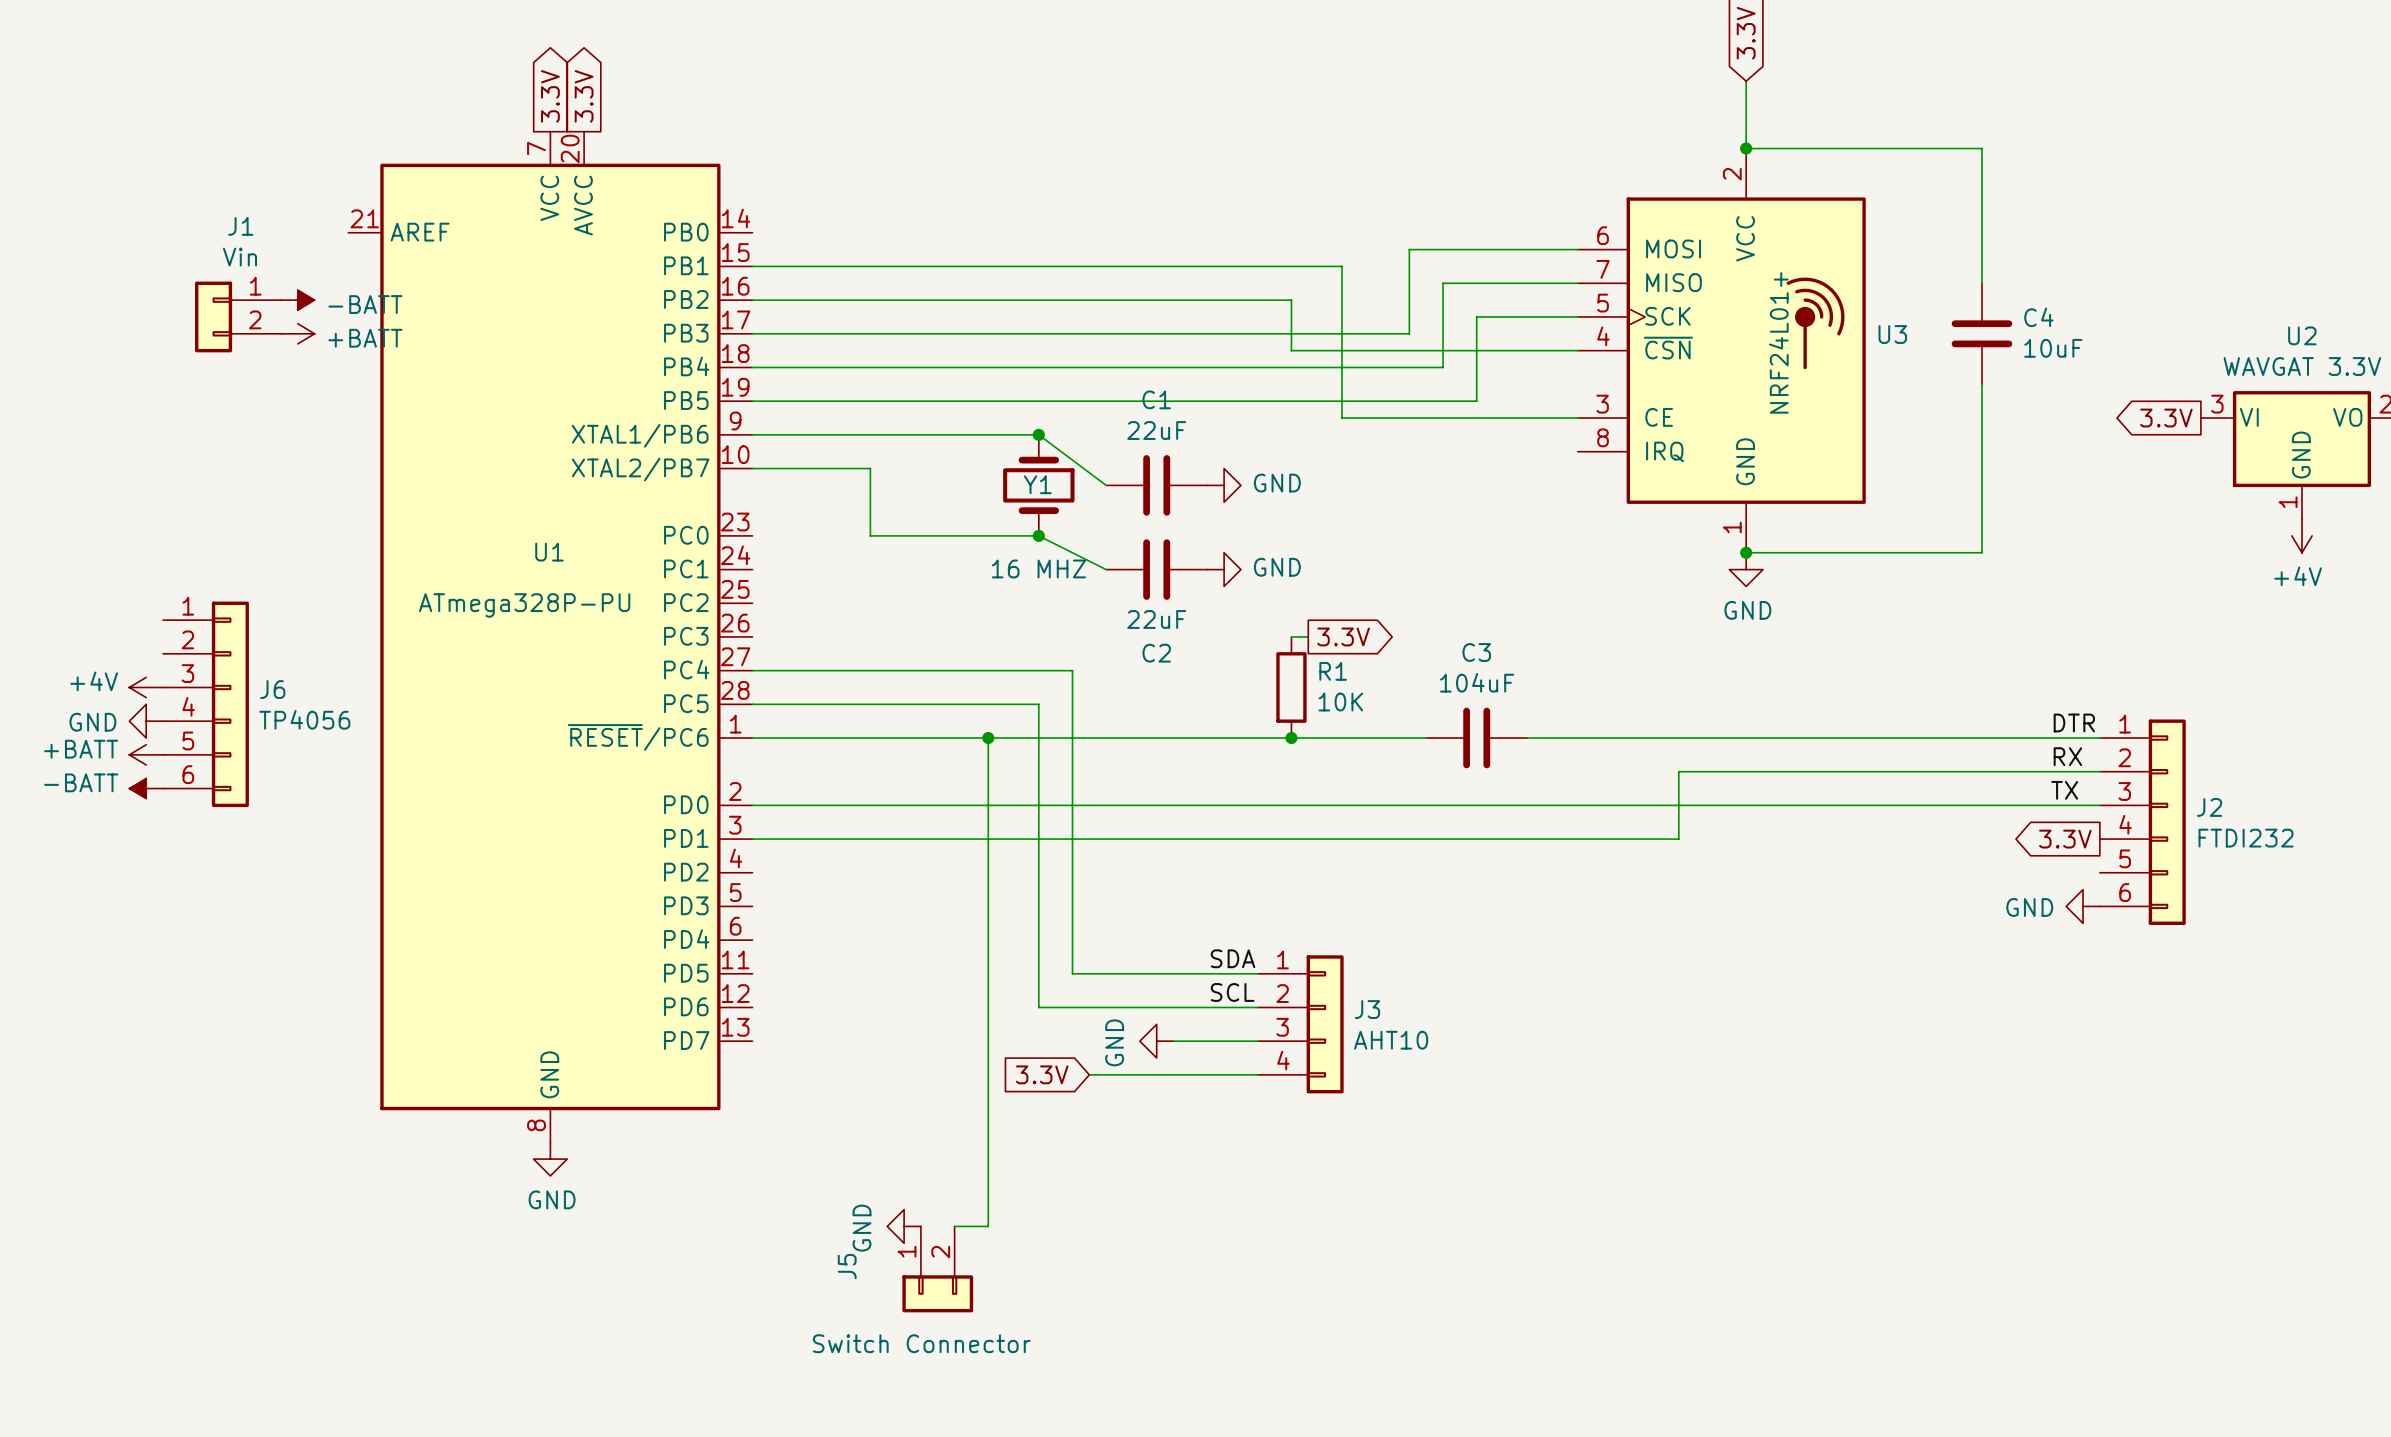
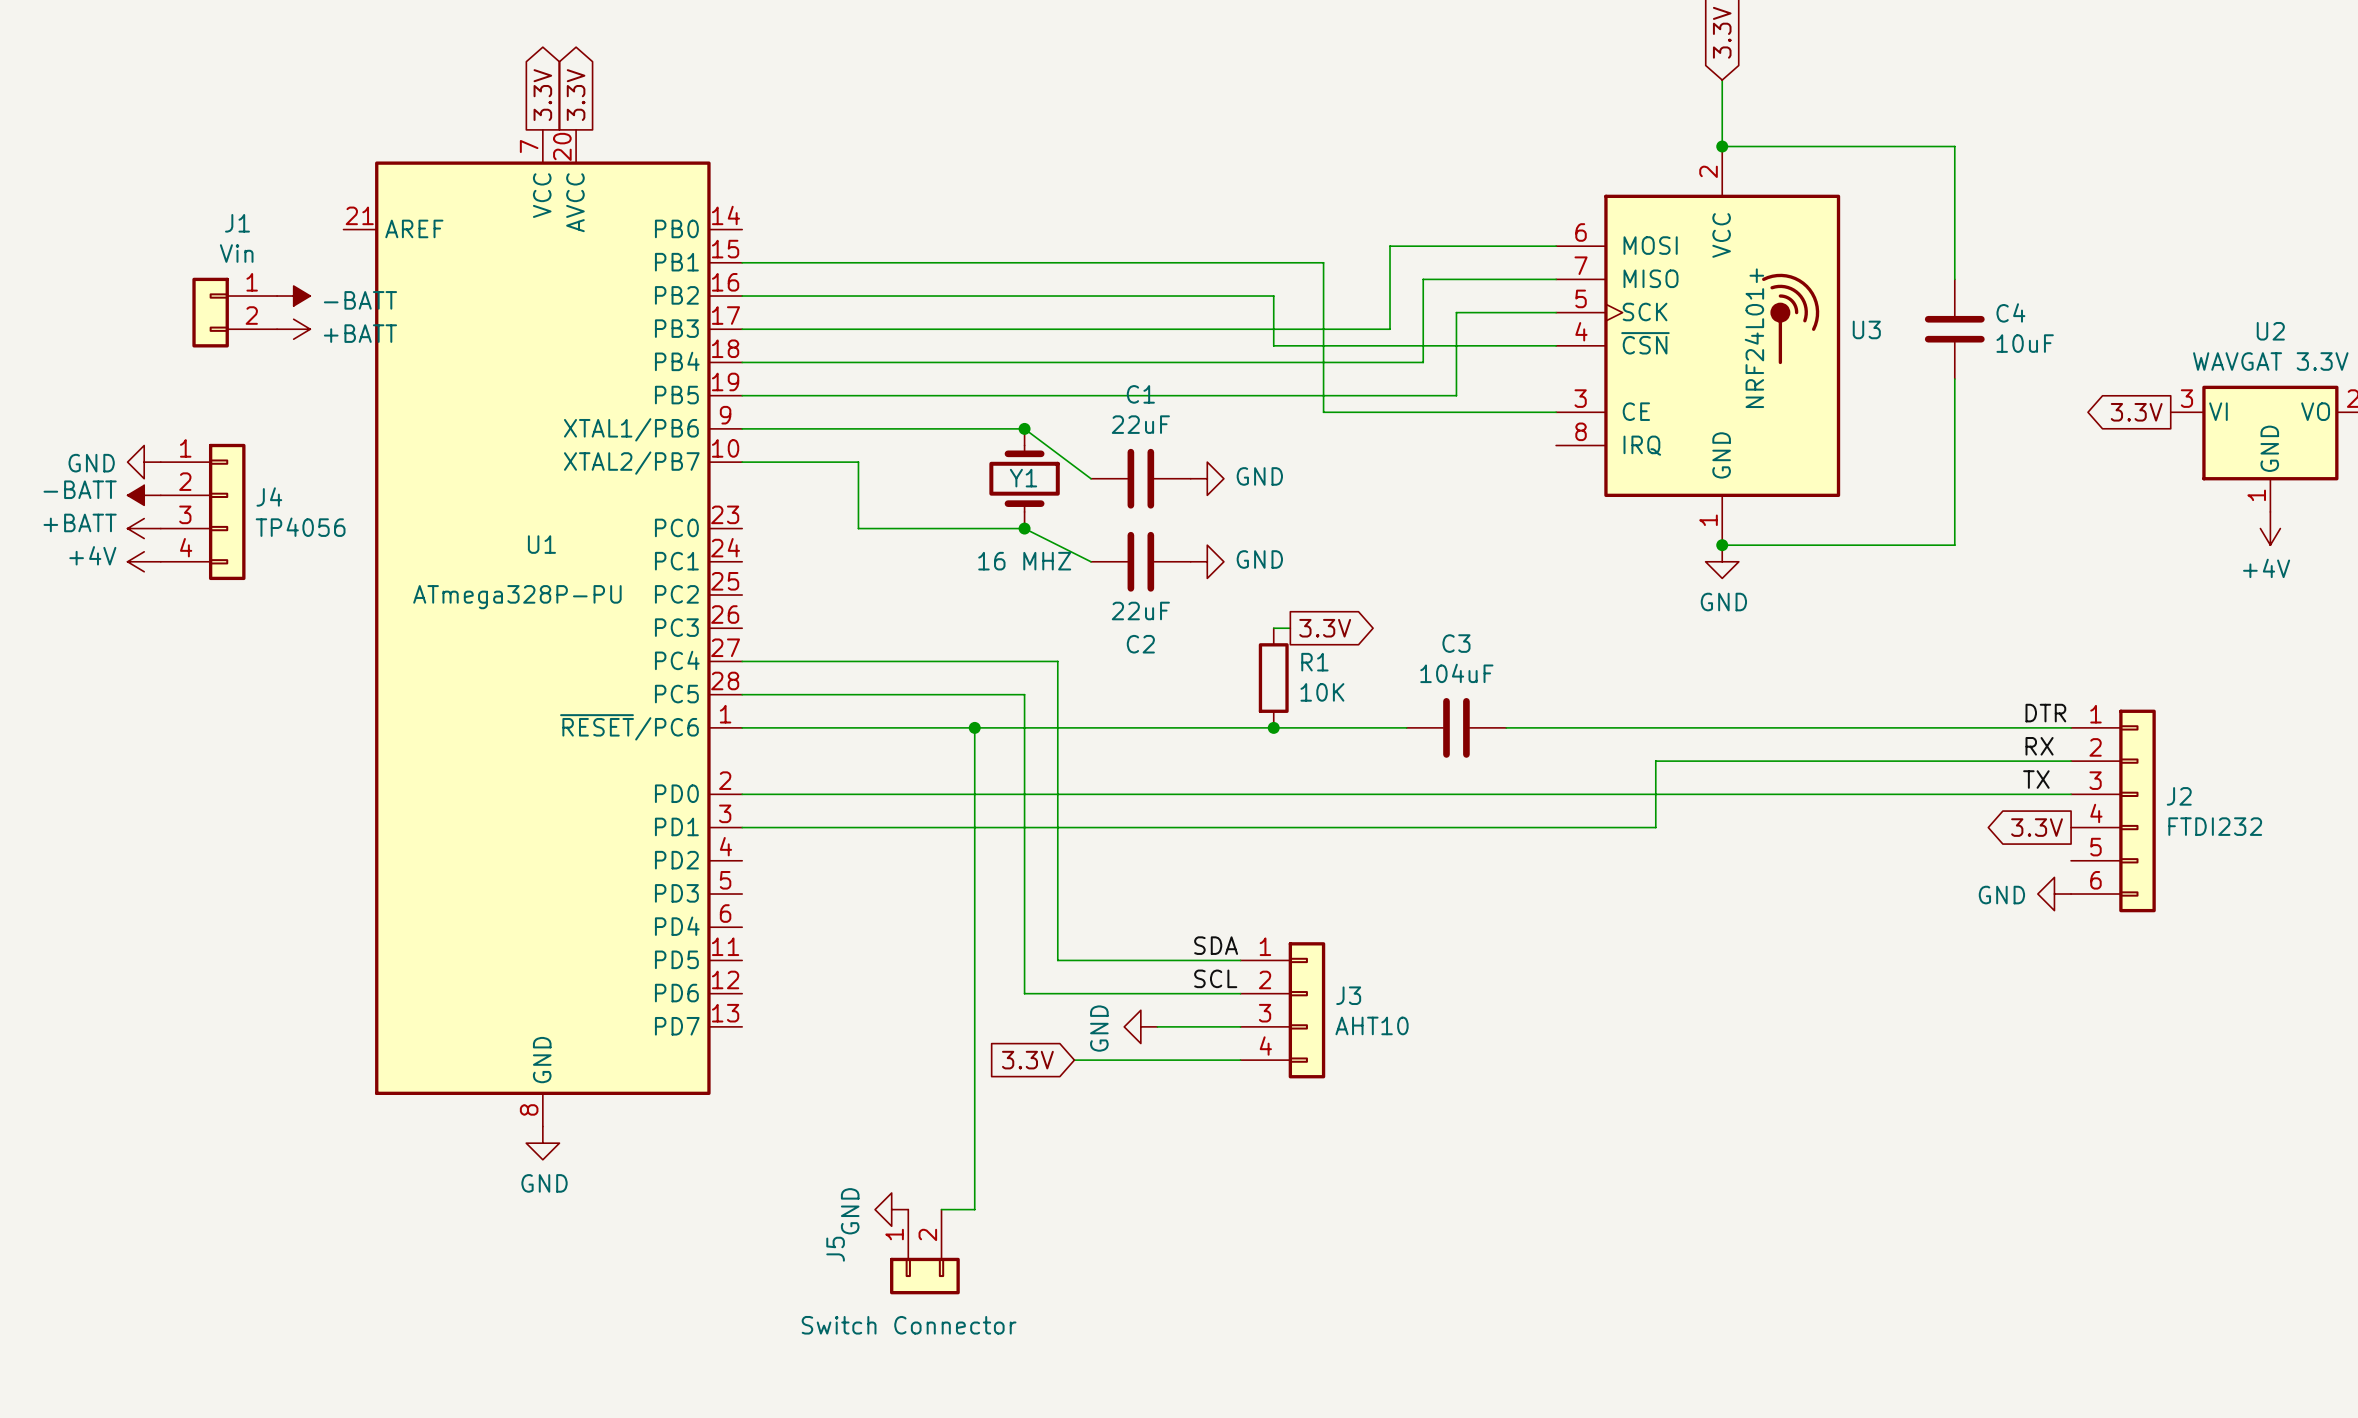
J4: none -> TP4056 (203, 511)
power symbol position: +4V (146, 687) -> +4V (144, 561)
J6: TP4056 (205, 704) -> none
power symbol position: GND (146, 721) -> GND (144, 462)
power symbol position: +BATT (146, 754) -> +BATT (144, 528)
power symbol position: -BATT (146, 788) -> -BATT (144, 495)

